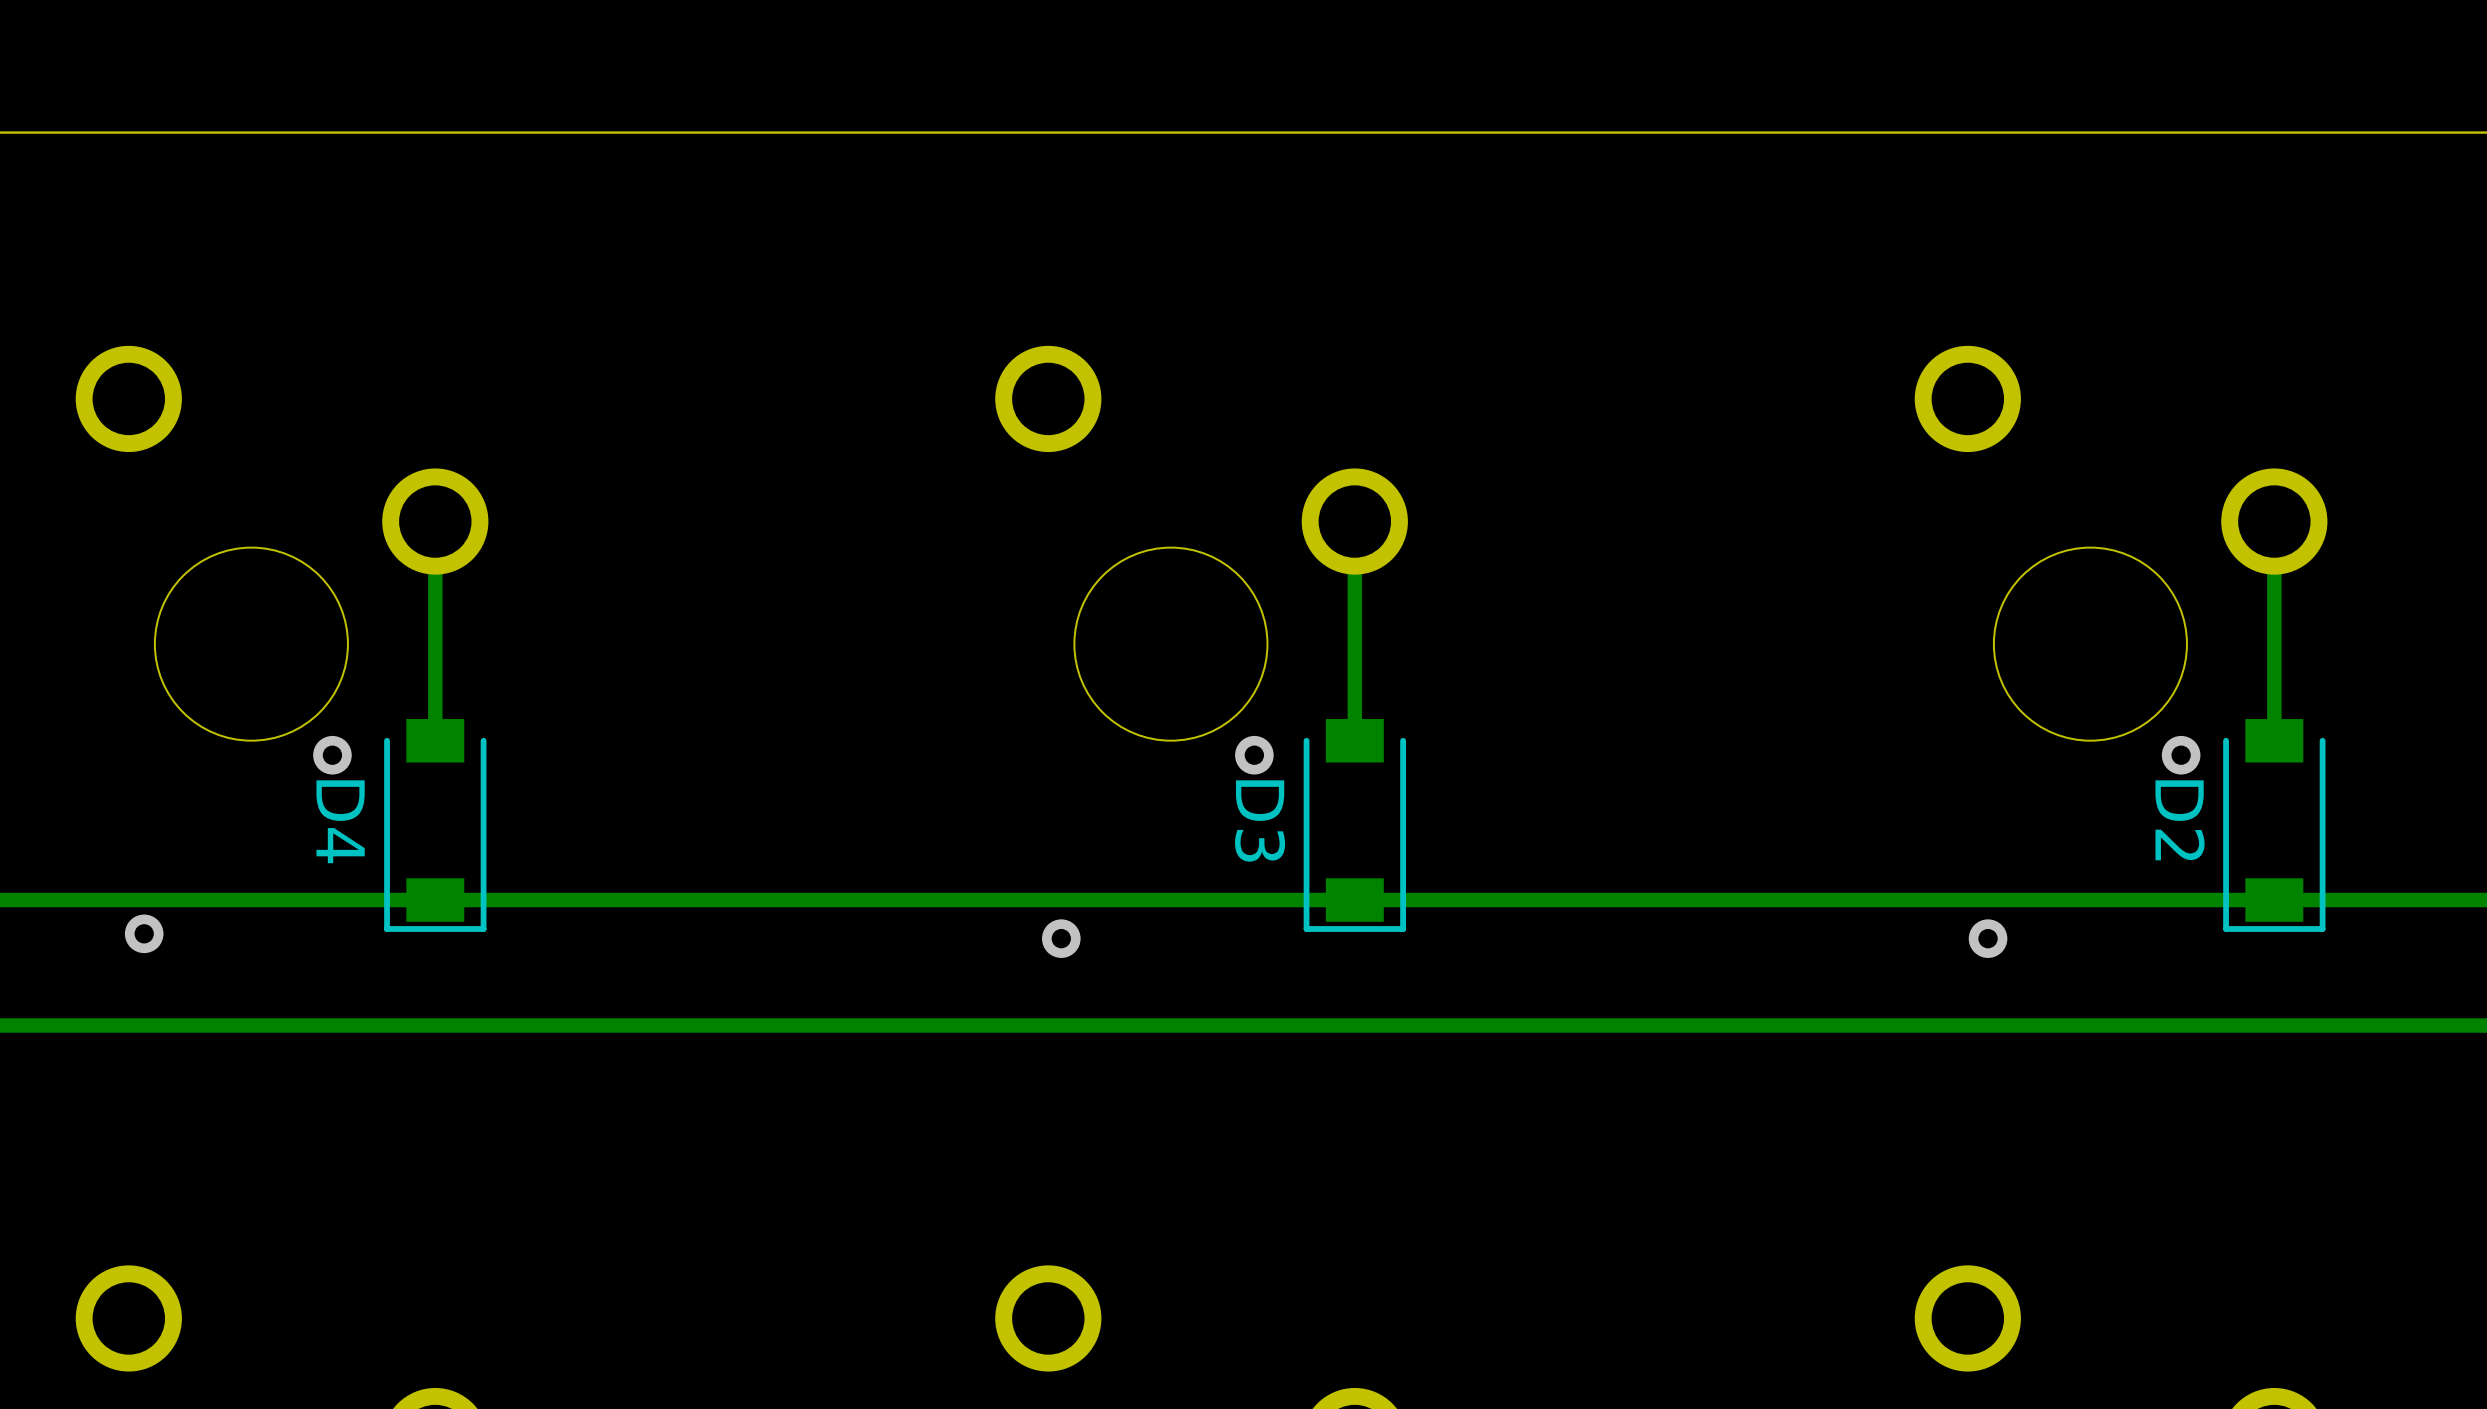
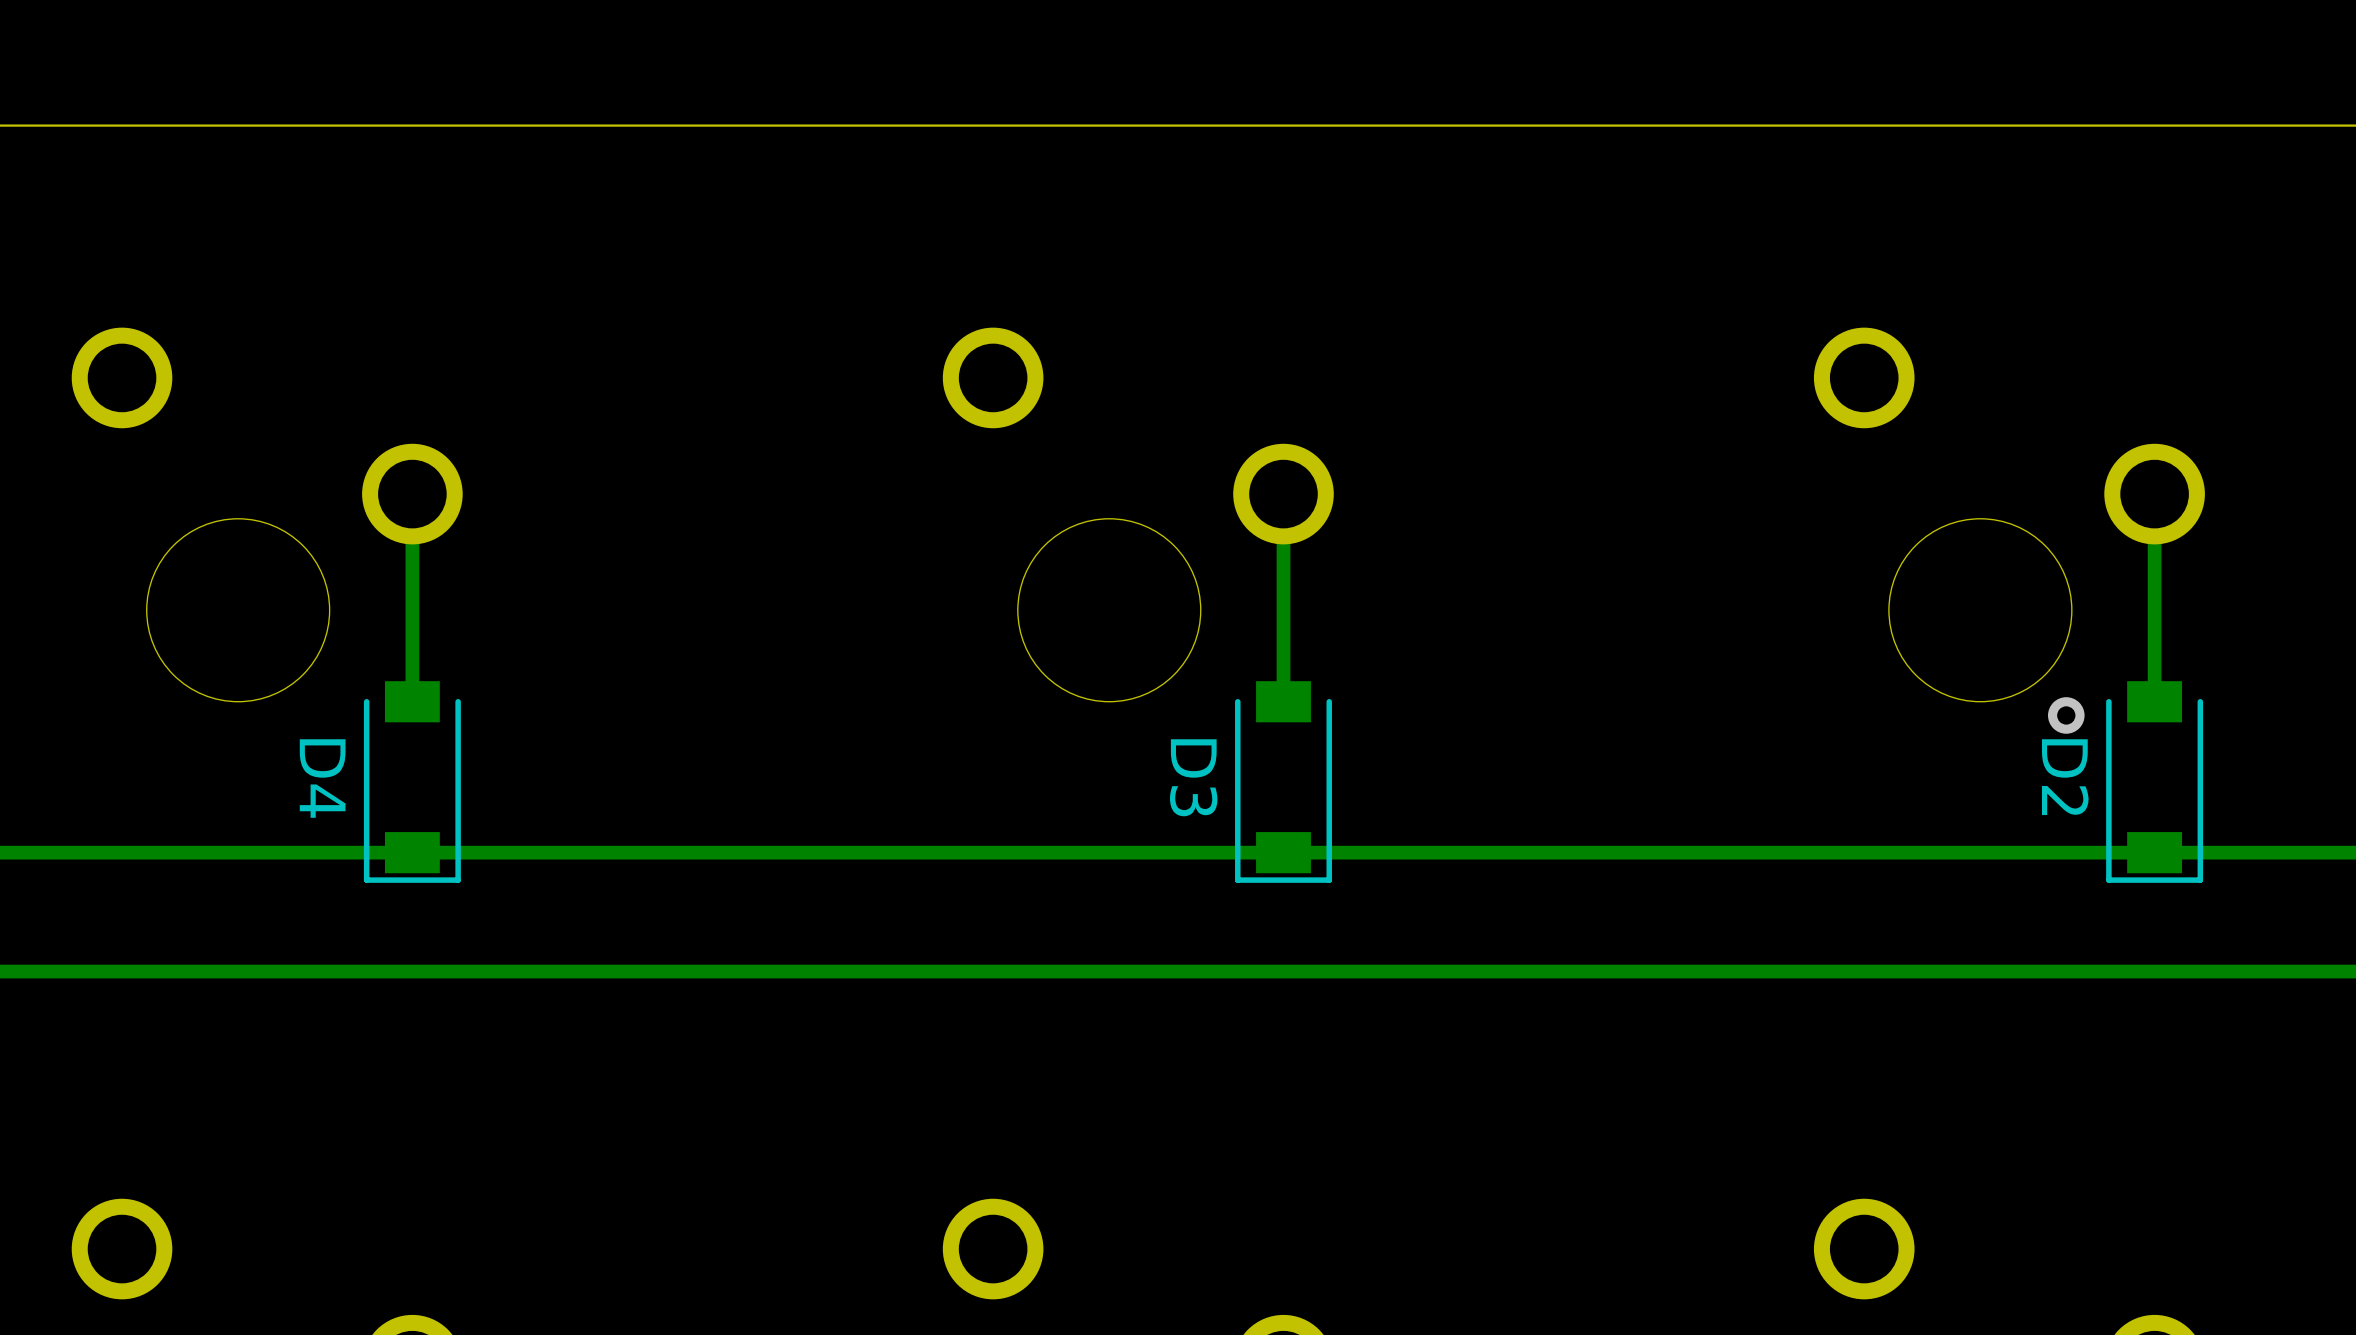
via: (332, 755) -> none
via: (1254, 755) -> none
via: (144, 933) -> none
via: (1061, 938) -> none
via: (1988, 938) -> none

